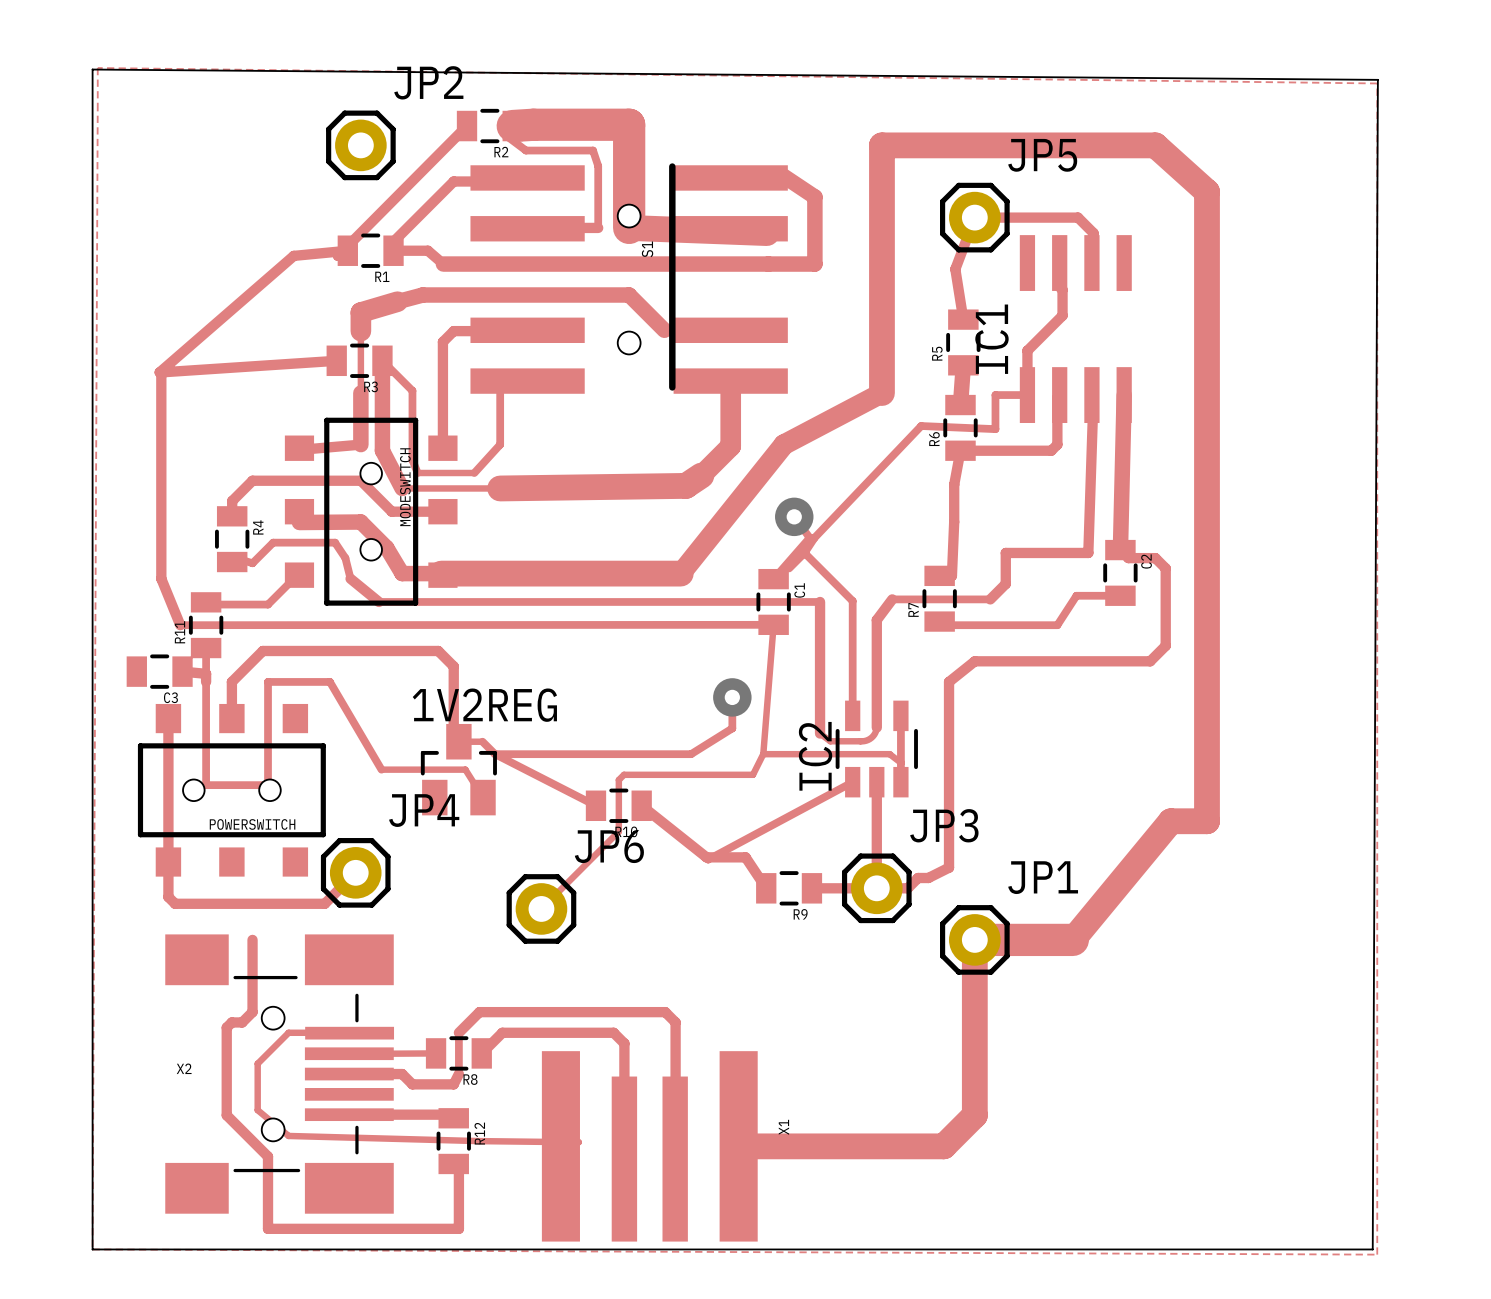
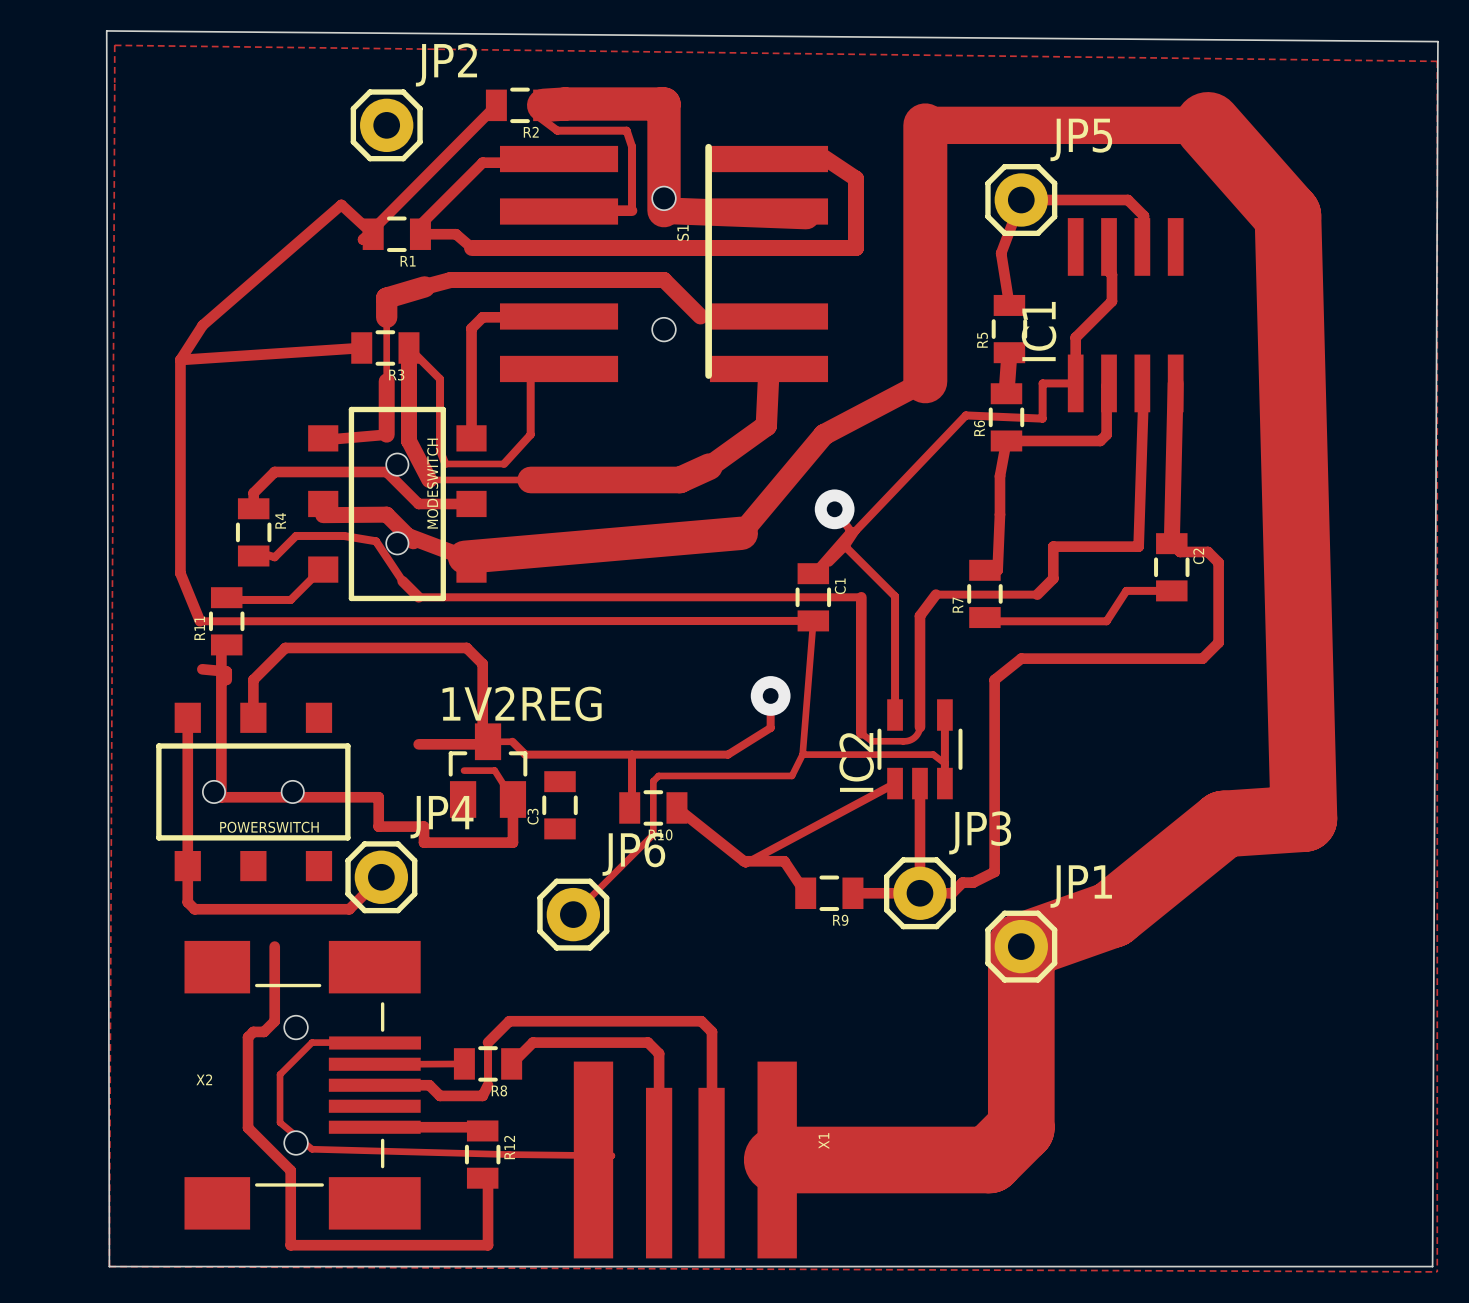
track: (1155, 145) (1206, 191) (1206, 821) (1170, 821) (1072, 939) (974, 939) -> (1207, 125) (1287, 216) (1303, 818) (1223, 823) (1111, 914) (1021, 946)
track width: thin (1155, 145) (881, 145) (881, 393) -> thick (1207, 125) (925, 125) (925, 381)
track: (347, 250) (293, 255) (159, 372) (161, 372) -> (373, 234) (341, 204) (202, 325) (180, 359)
track: (730, 381) (730, 446) (701, 475) (685, 485) (500, 488) -> (768, 368) (766, 425) (709, 466) (680, 479) (530, 479)
track: (783, 444) (680, 573) (402, 573) (386, 547) -> (823, 434) (741, 533) (464, 557) (408, 535)
track: (319, 542) (335, 542) (345, 558) (350, 578) (378, 601) (391, 601) -> (344, 535) (376, 541) (402, 581) (418, 597)
track: (206, 648) (206, 785) (268, 785) (268, 681) (329, 681) (381, 769) (435, 769) -> (226, 644) (221, 644) (221, 797) (378, 797) (378, 826) (424, 826) (424, 842) (512, 842) (512, 799)
C3 rotation: 0° (159, 671) -> 90° clockwise (560, 805)
C3 position: (159, 671) -> (560, 805)
track: none -> (488, 741) (488, 744) (418, 744)
track: (495, 754) (595, 805) -> (632, 754) (632, 807) (629, 807)
track width: thin (974, 939) (974, 1115) (943, 1146) (738, 1146) -> thick (1021, 946) (1021, 1127) (989, 1160) (777, 1160)
board edge: (92, 1249) (92, 69) (1377, 79) (1372, 1249) -> (109, 1266) (106, 30) (1437, 41) (1432, 1266)

